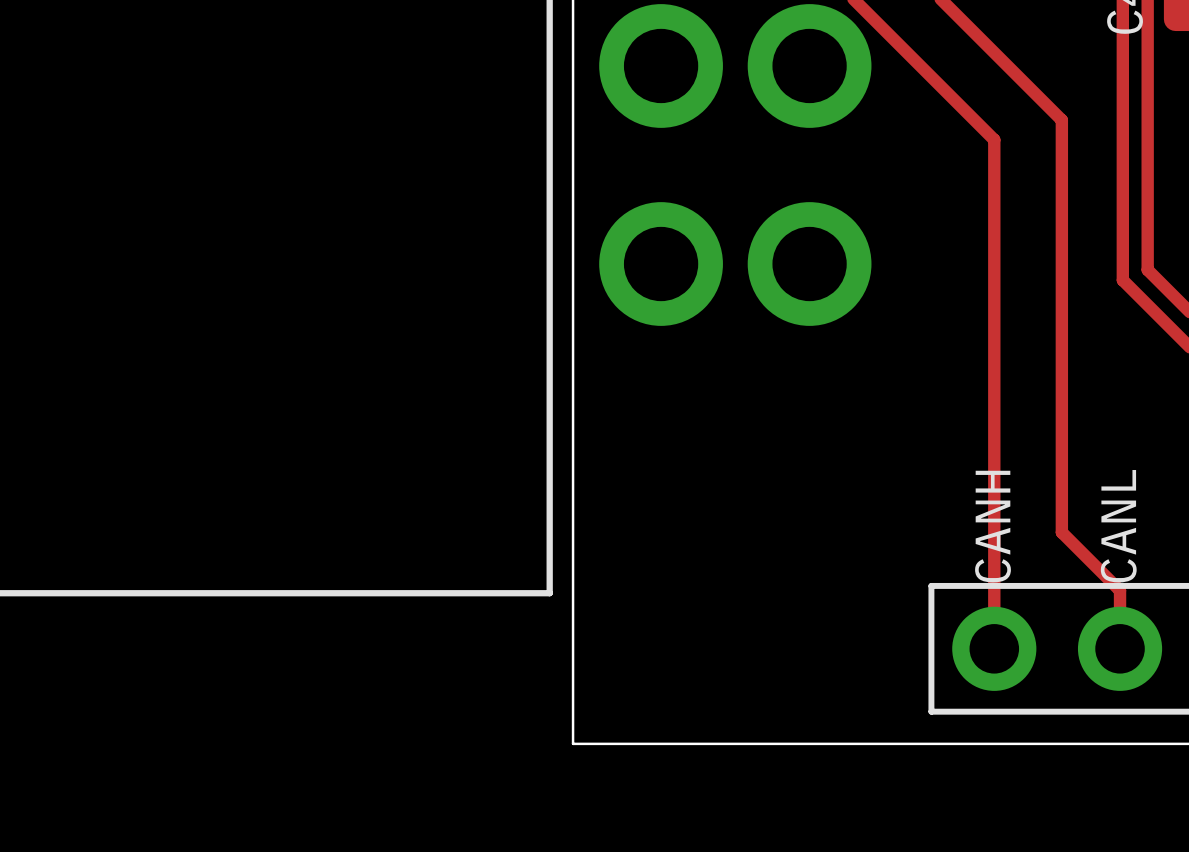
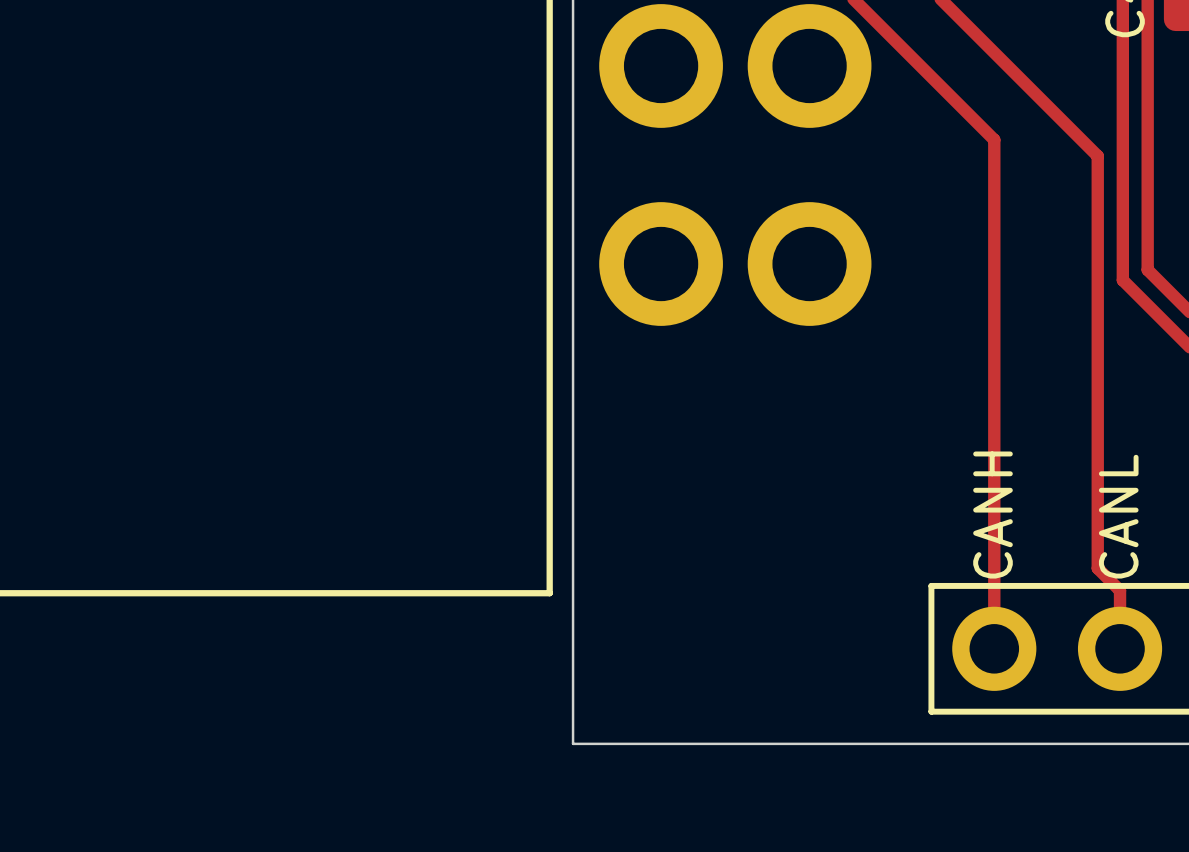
track: (1061, 120) (1061, 532) (1097, 568) -> (1061, 120) (1097, 156) (1097, 568)

